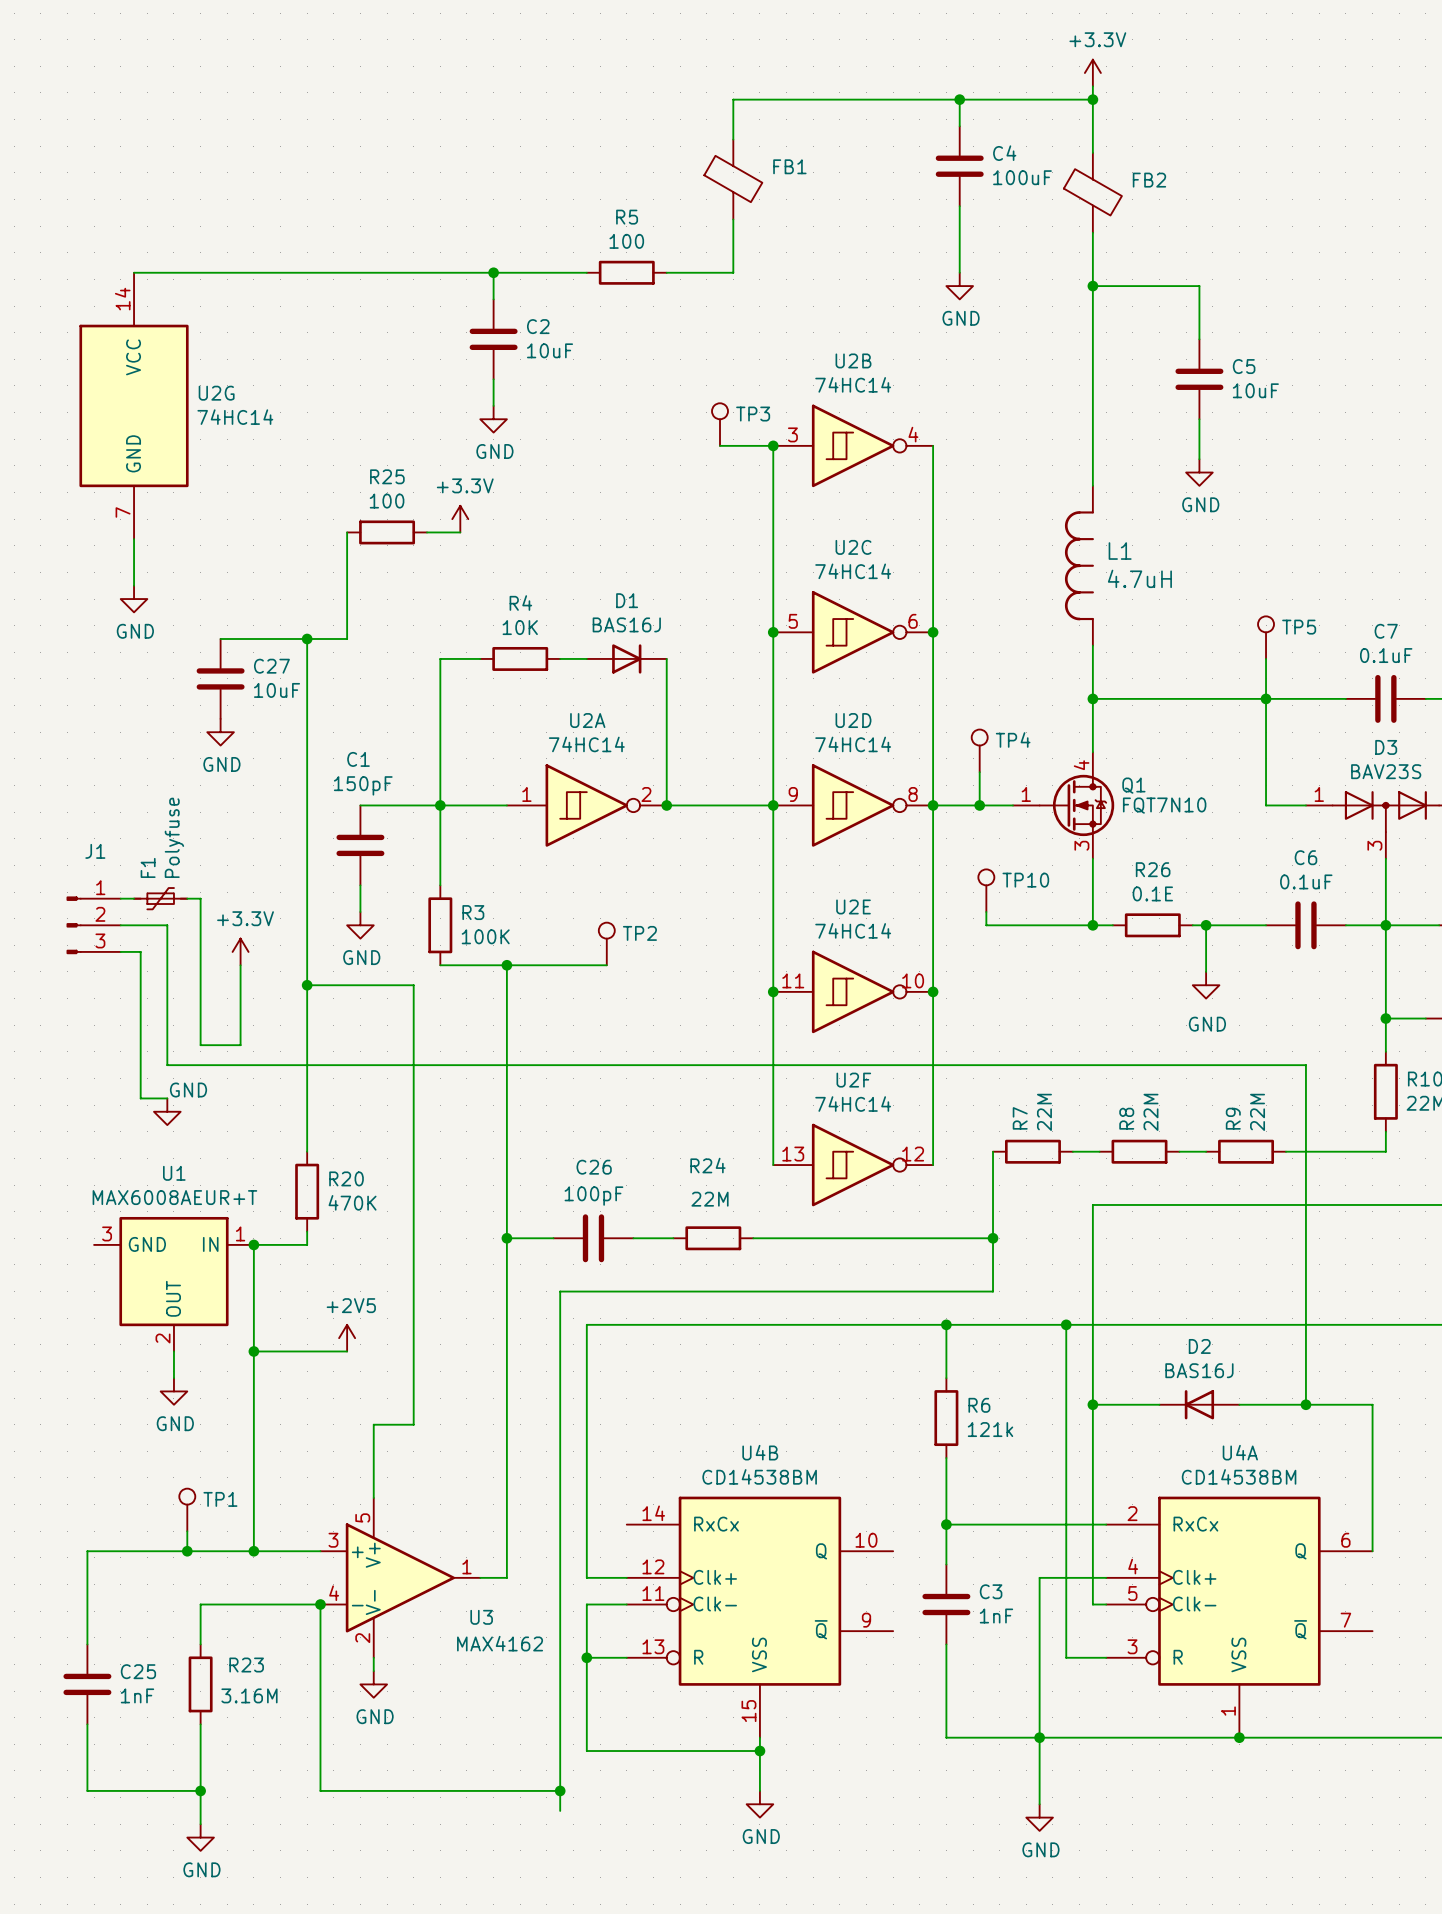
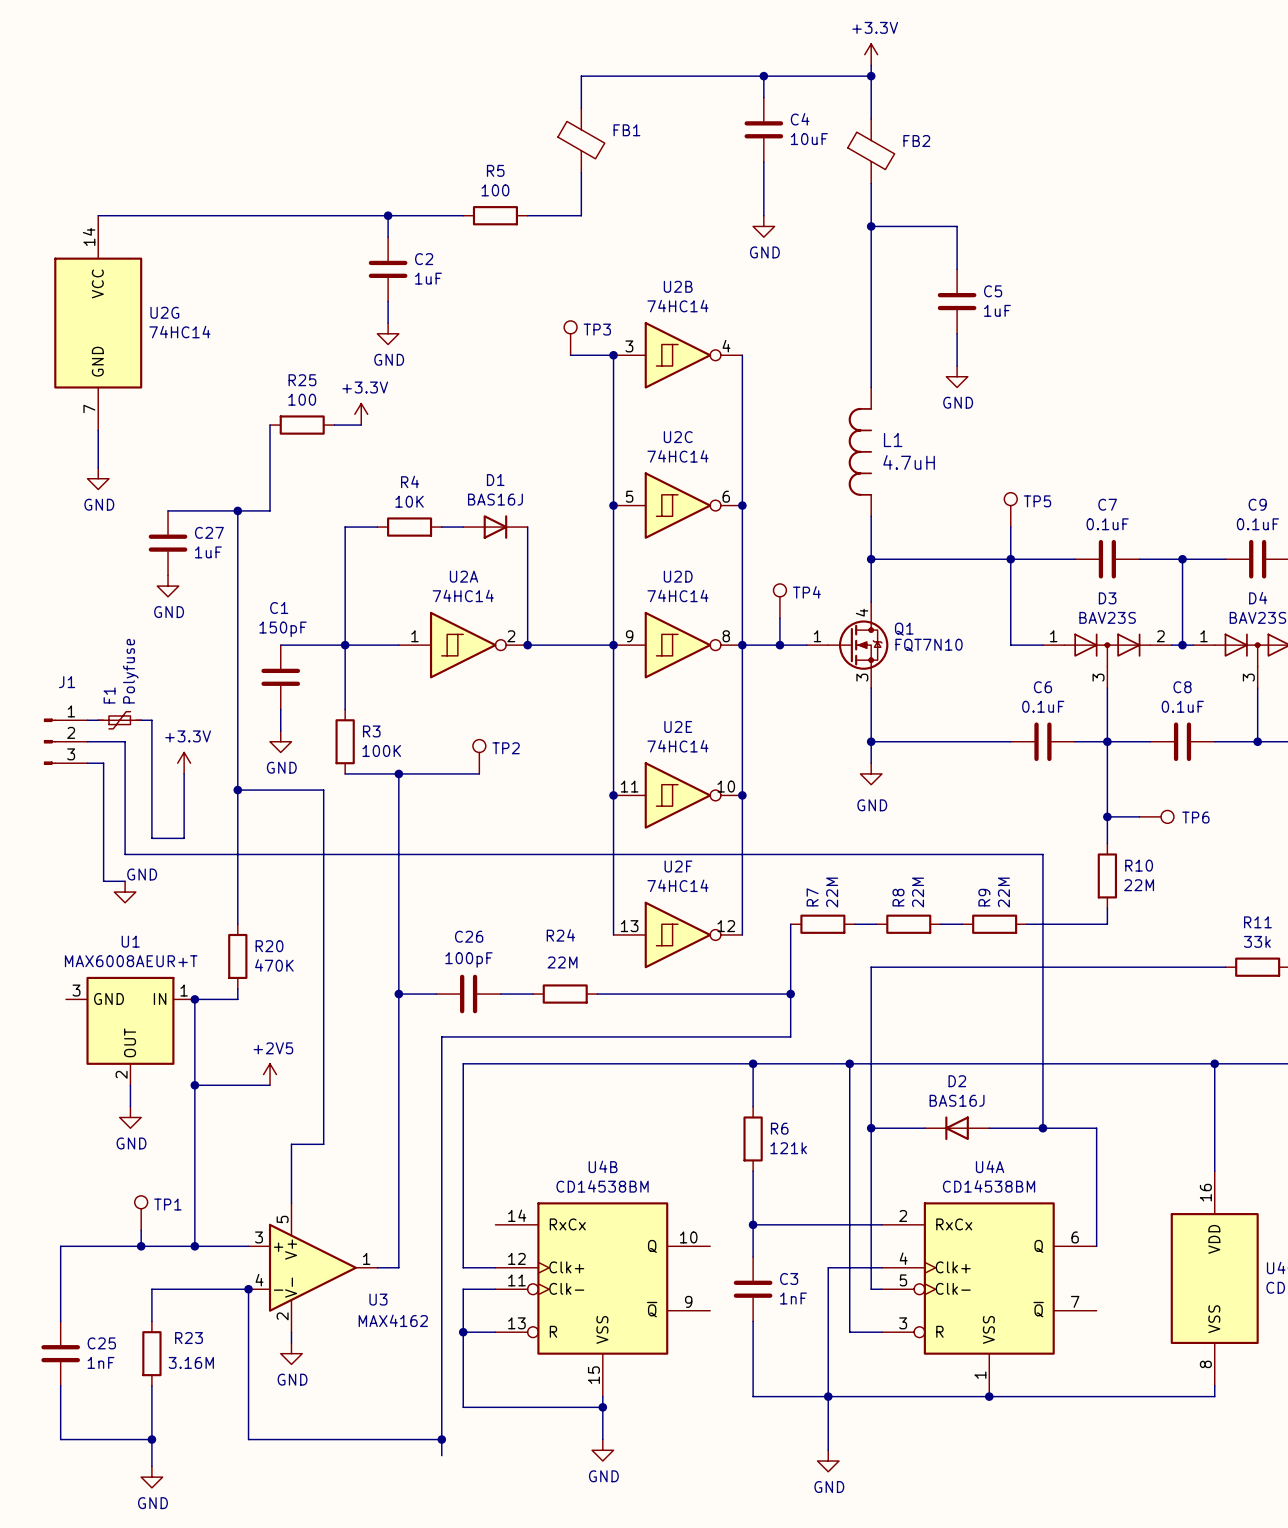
C4 value: 100uF (1022, 177) -> 10uF (809, 139)
C2 value: 10uF (550, 350) -> 1uF (428, 278)
C5 value: 10uF (1255, 390) -> 1uF (997, 310)
C27 value: 10uF (277, 690) -> 1uF (208, 552)
TP10: (986, 890) -> none
wire: (986, 912) (986, 925) (1092, 925) -> (871, 763) (871, 741)
wire: none -> (887, 741) (951, 741)
R26: 0.1E (1152, 925) -> none
wire: (1206, 925) (1206, 971) -> none
junction: (1206, 925) -> none
power symbol position: GND (1206, 985) -> GND (871, 773)

